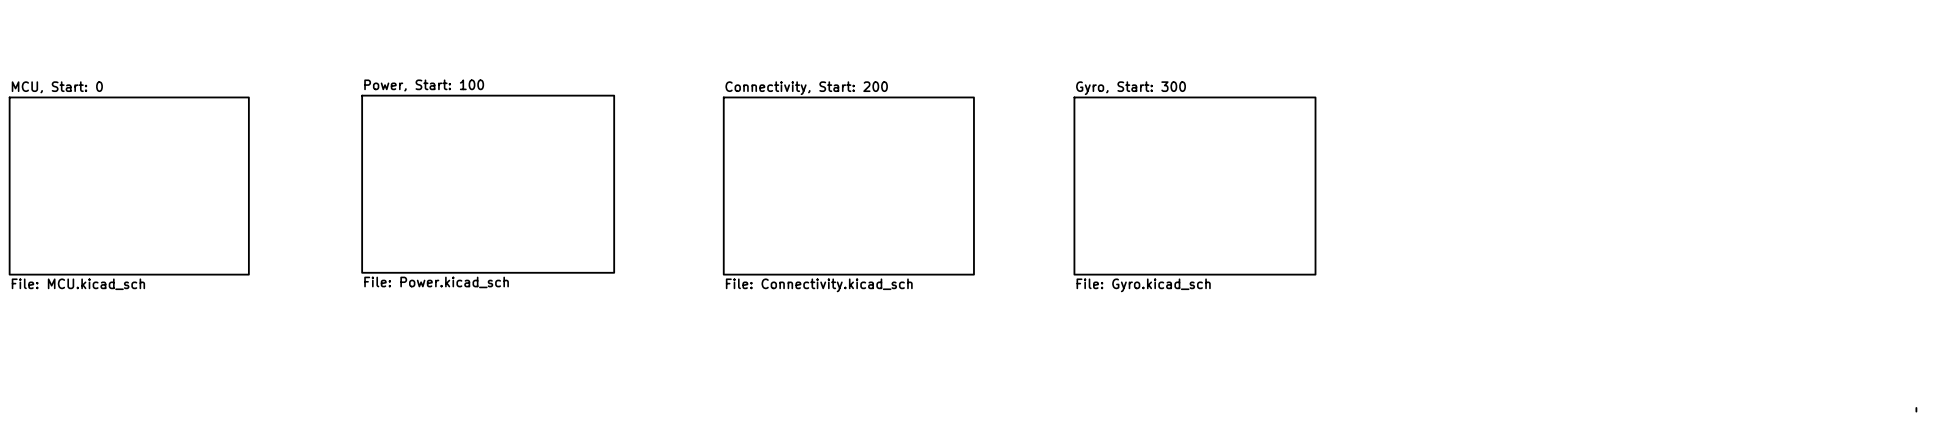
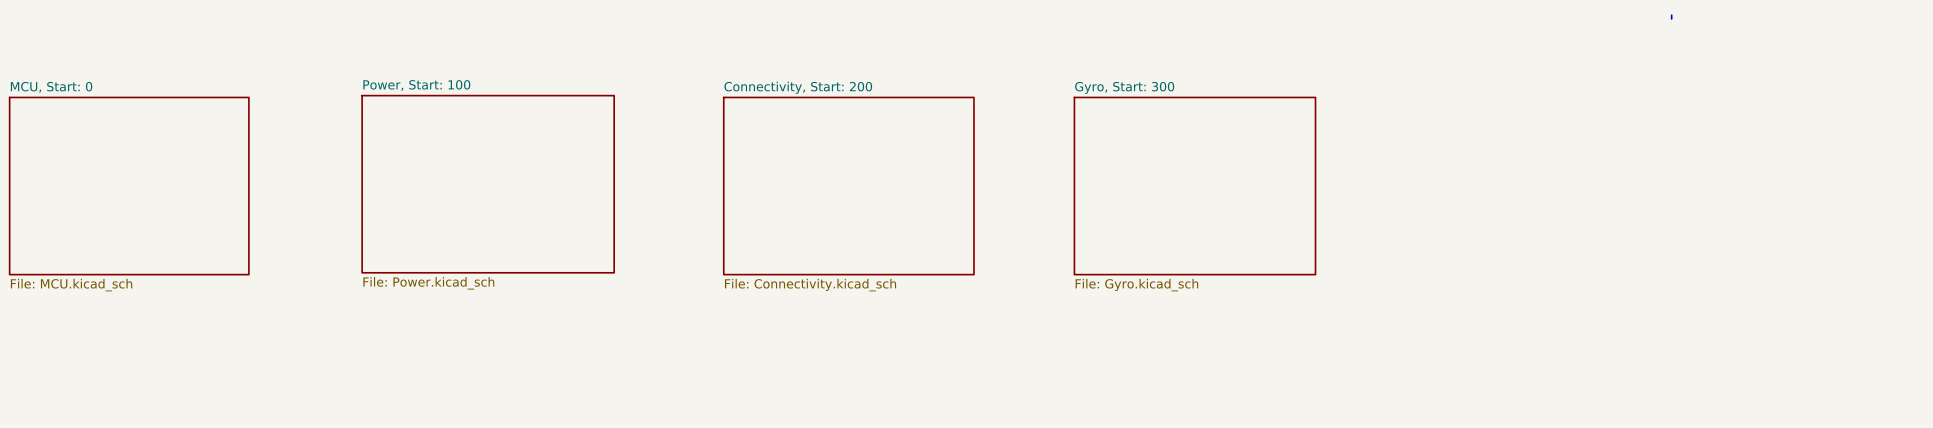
line: none -> (1671, 15) (1671, 18)
line: (1916, 407) (1916, 411) -> none

